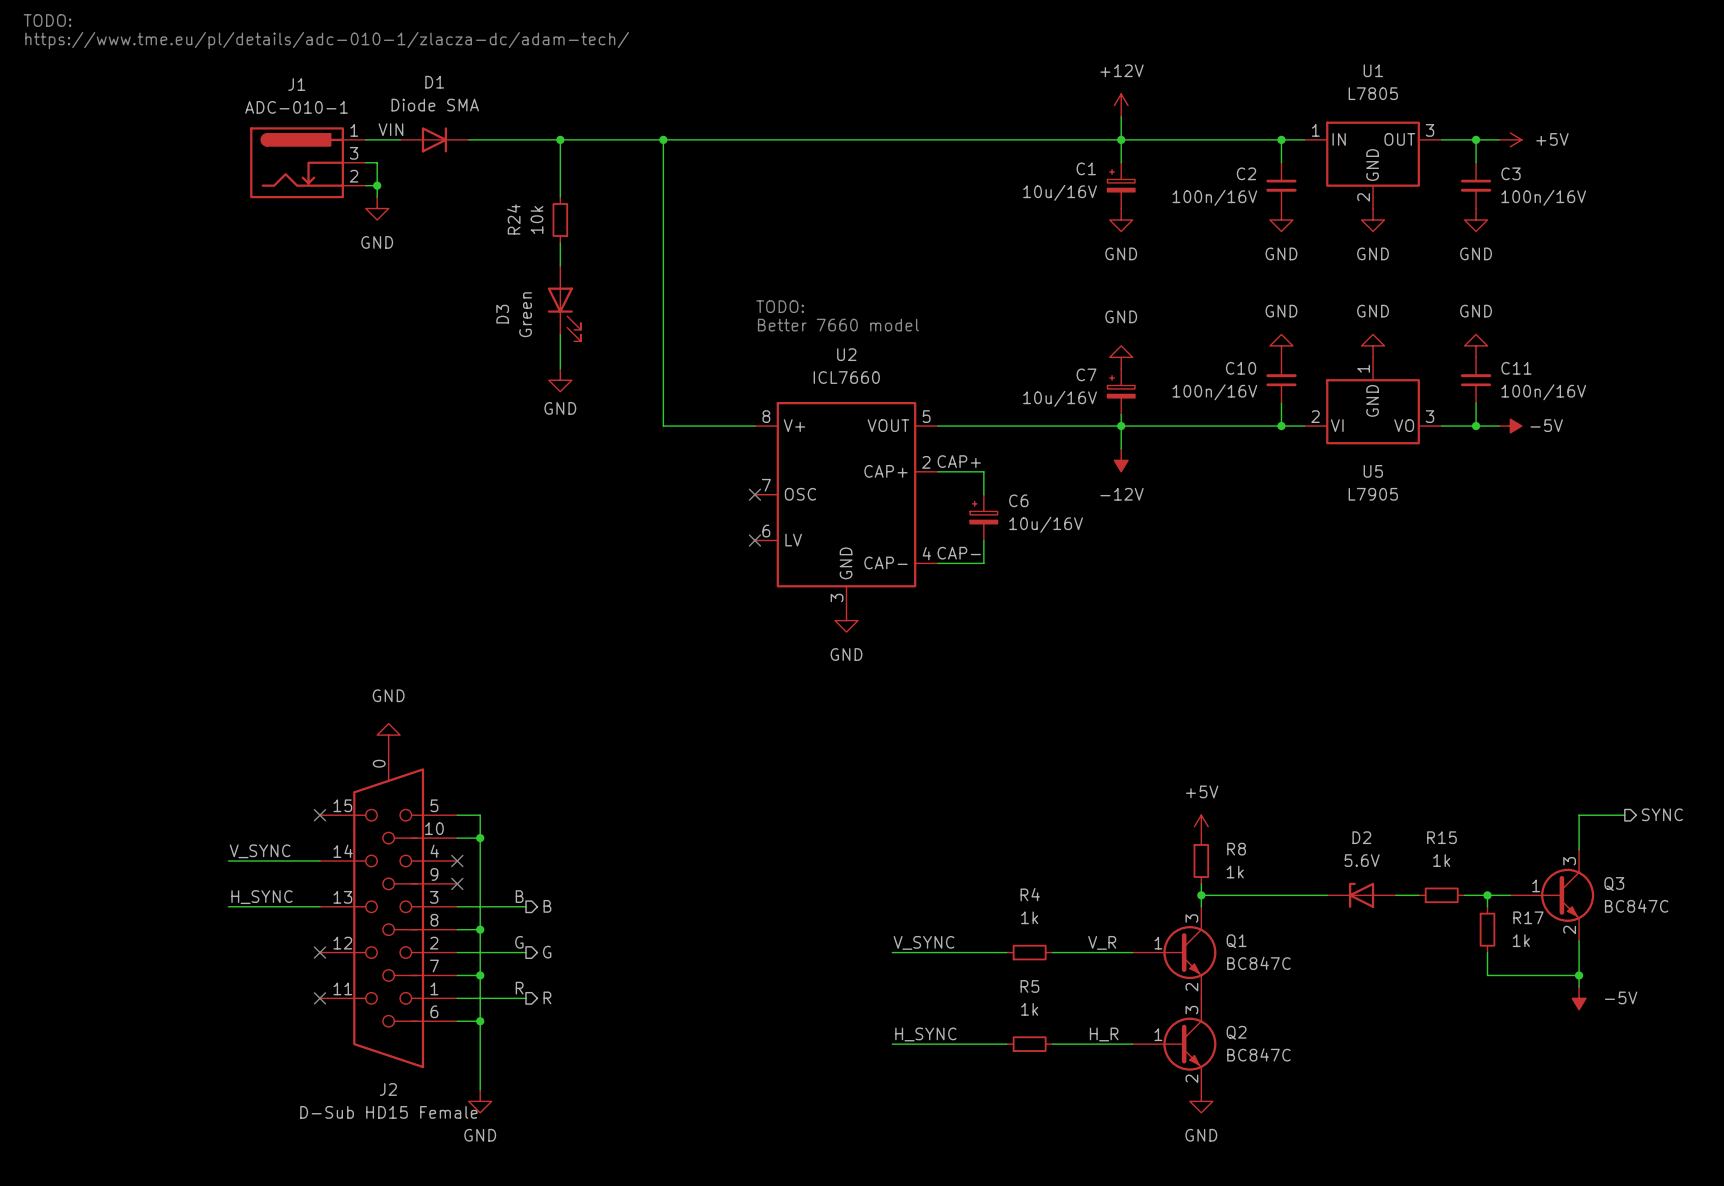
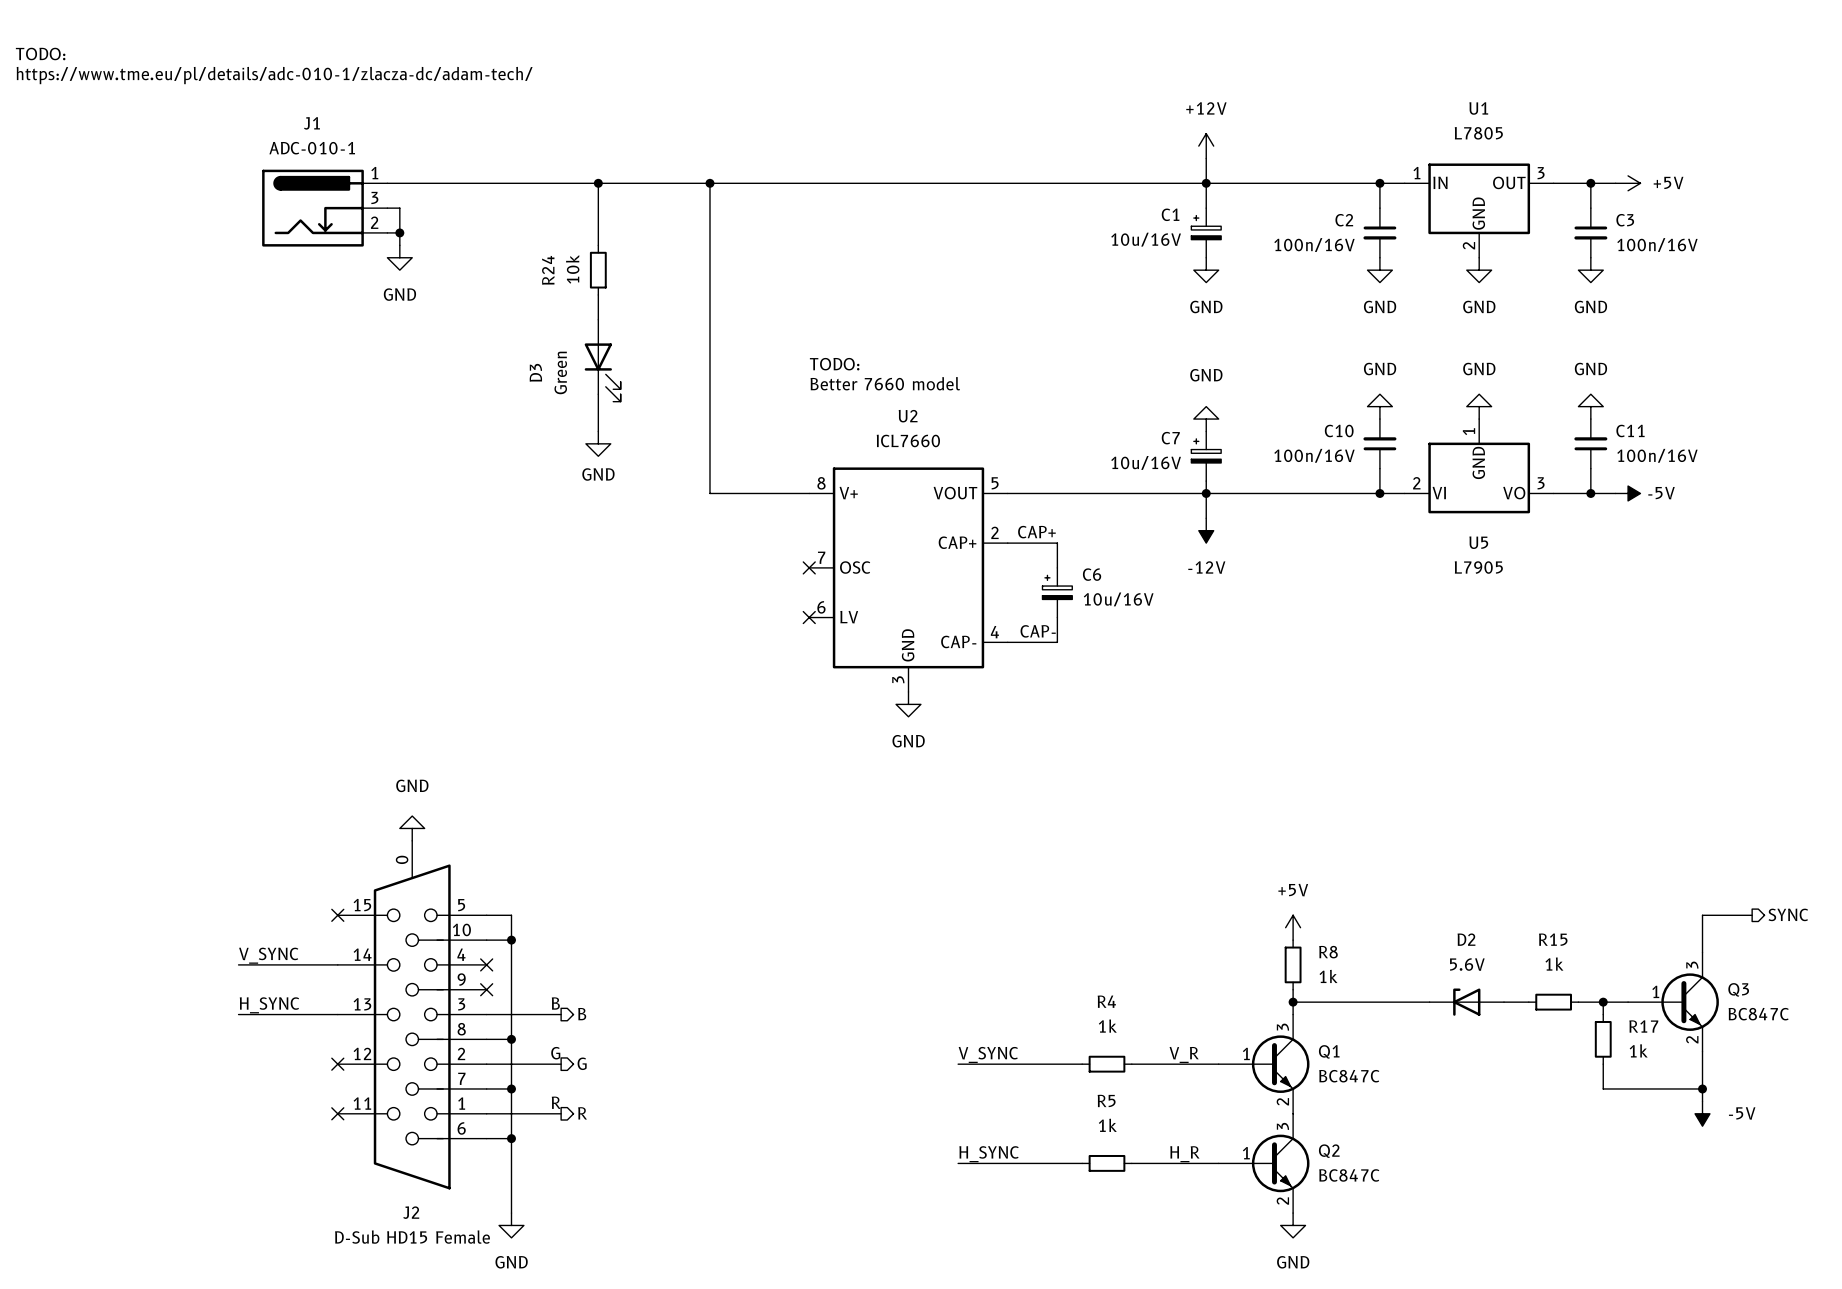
label: VIN (390, 129) -> none
D1: Diode SMA (434, 139) -> none

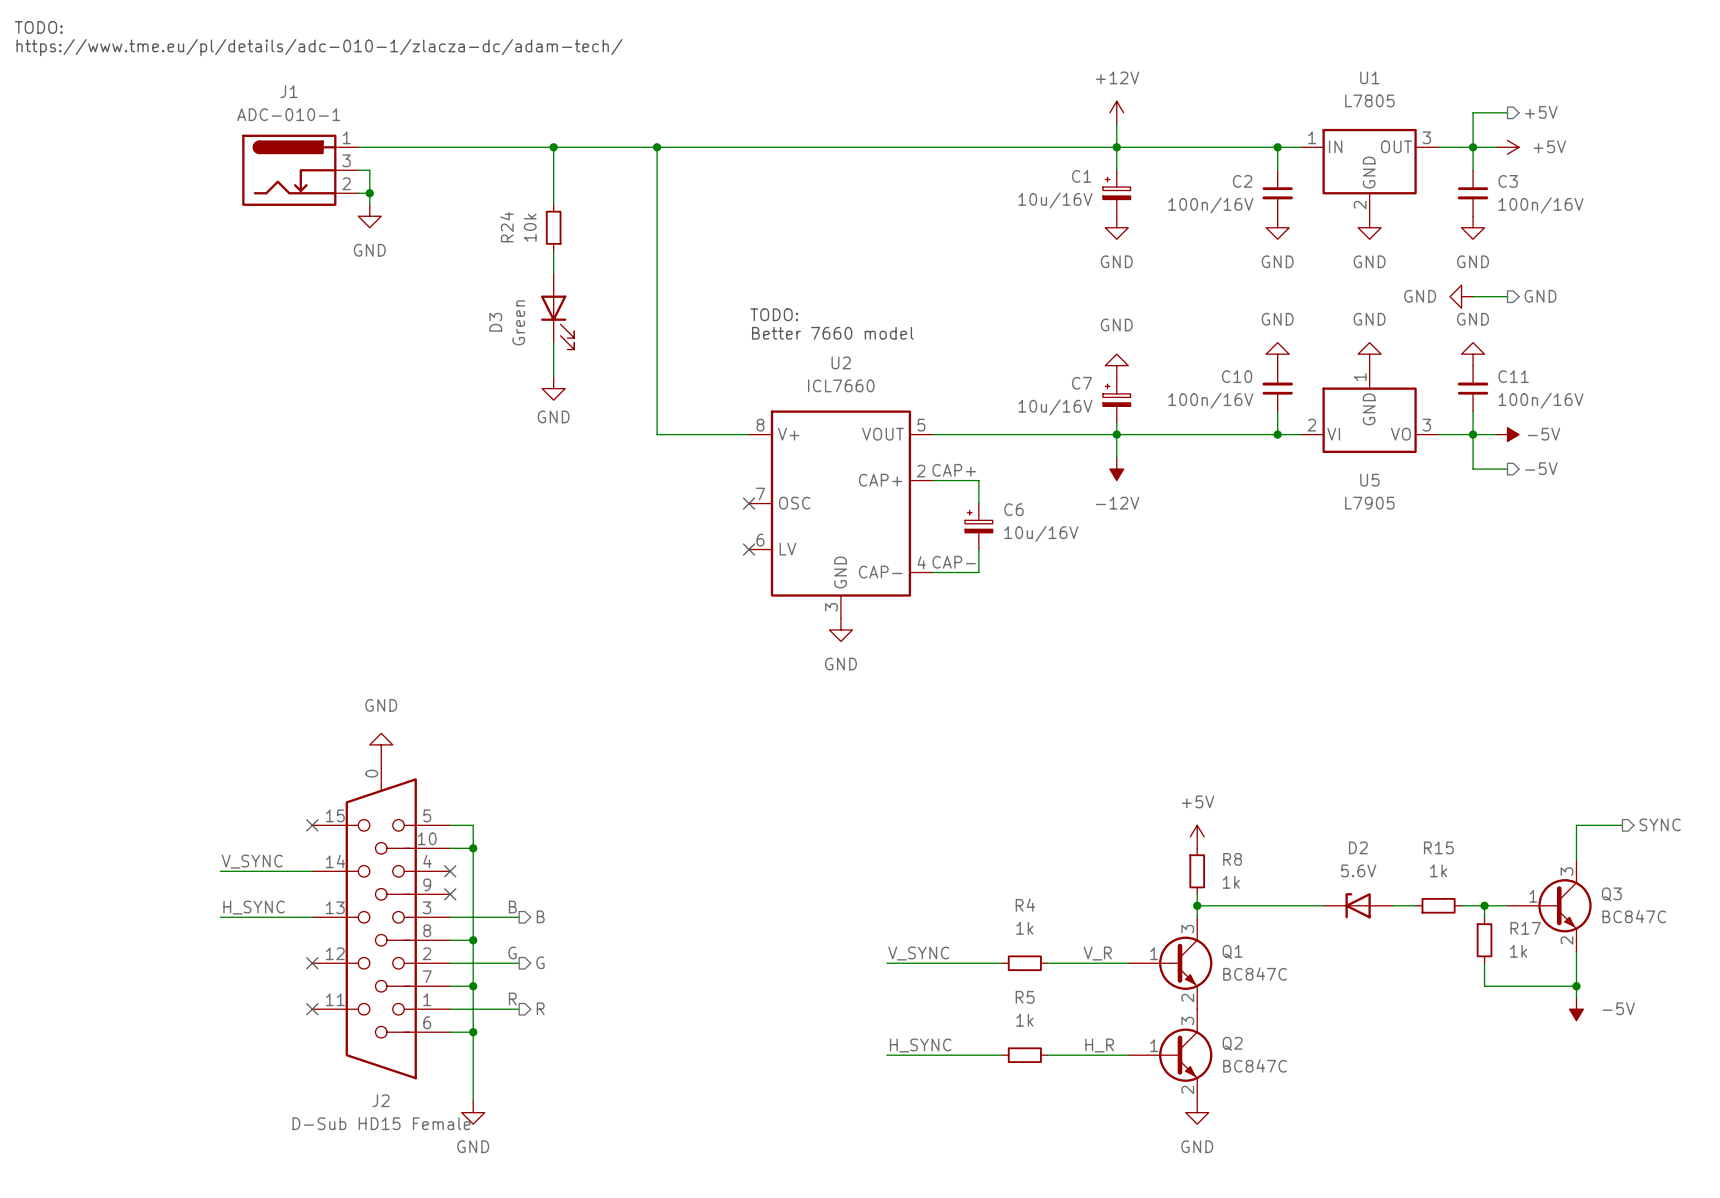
hierarchical label: none -> +5V (1541, 112)
wire: none -> (1507, 112) (1473, 112) (1473, 147)
power symbol: none -> GND (1461, 296)
wire: none -> (1473, 296) (1507, 296)
hierarchical label: none -> GND (1540, 296)
wire: none -> (1473, 434) (1473, 469) (1507, 469)
hierarchical label: none -> -5V (1541, 468)

